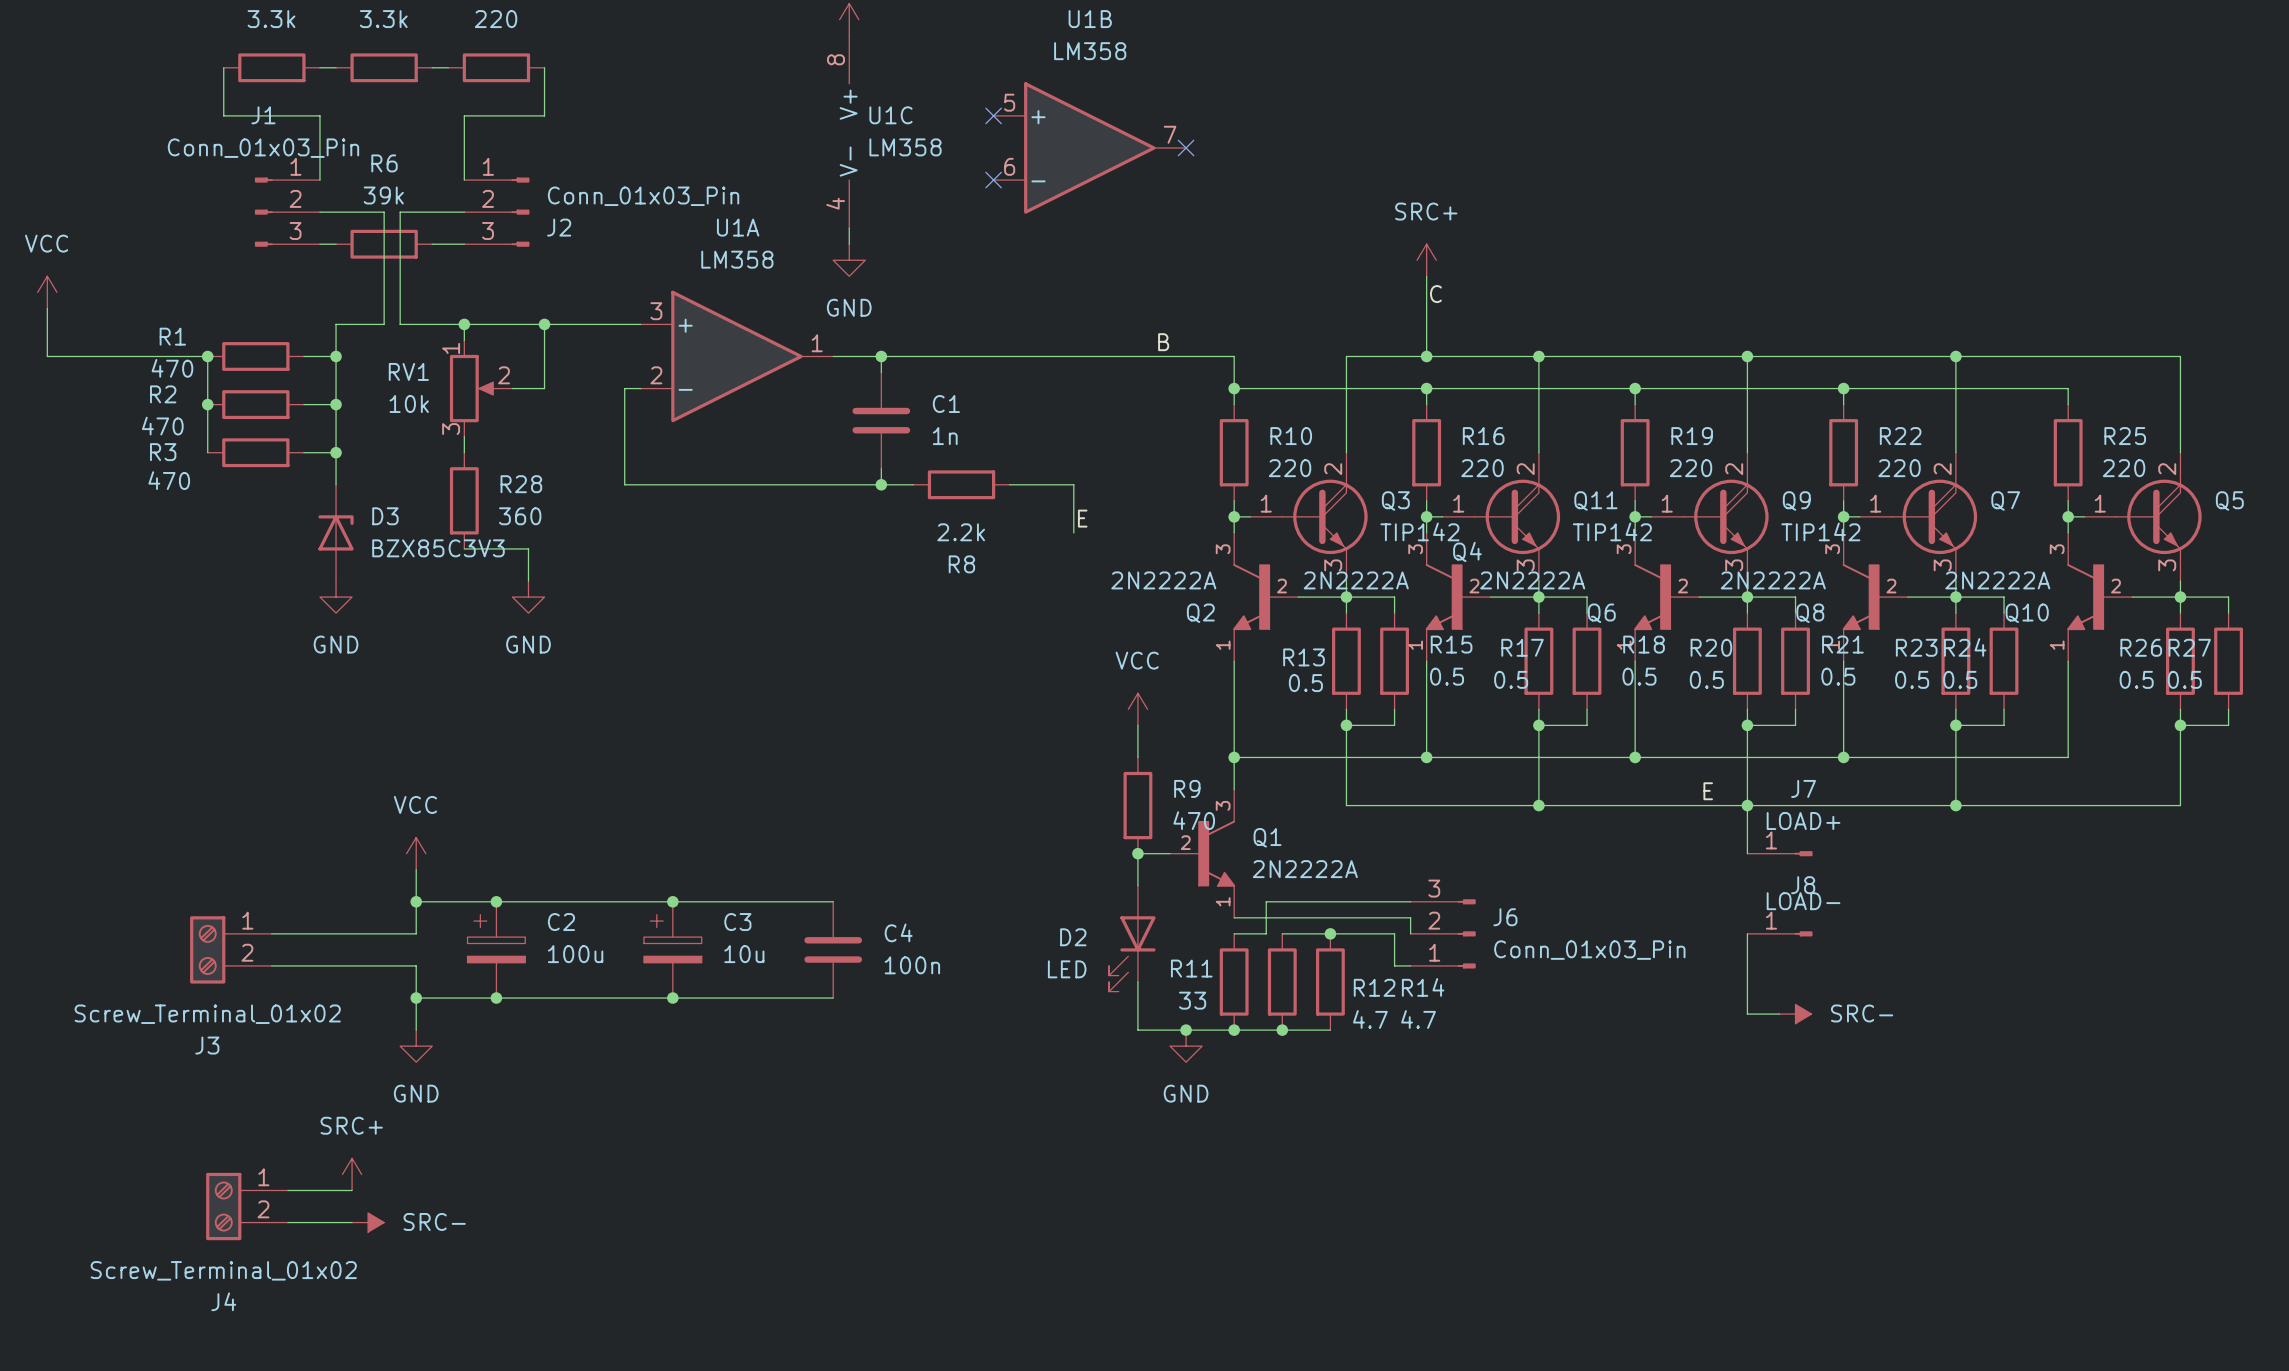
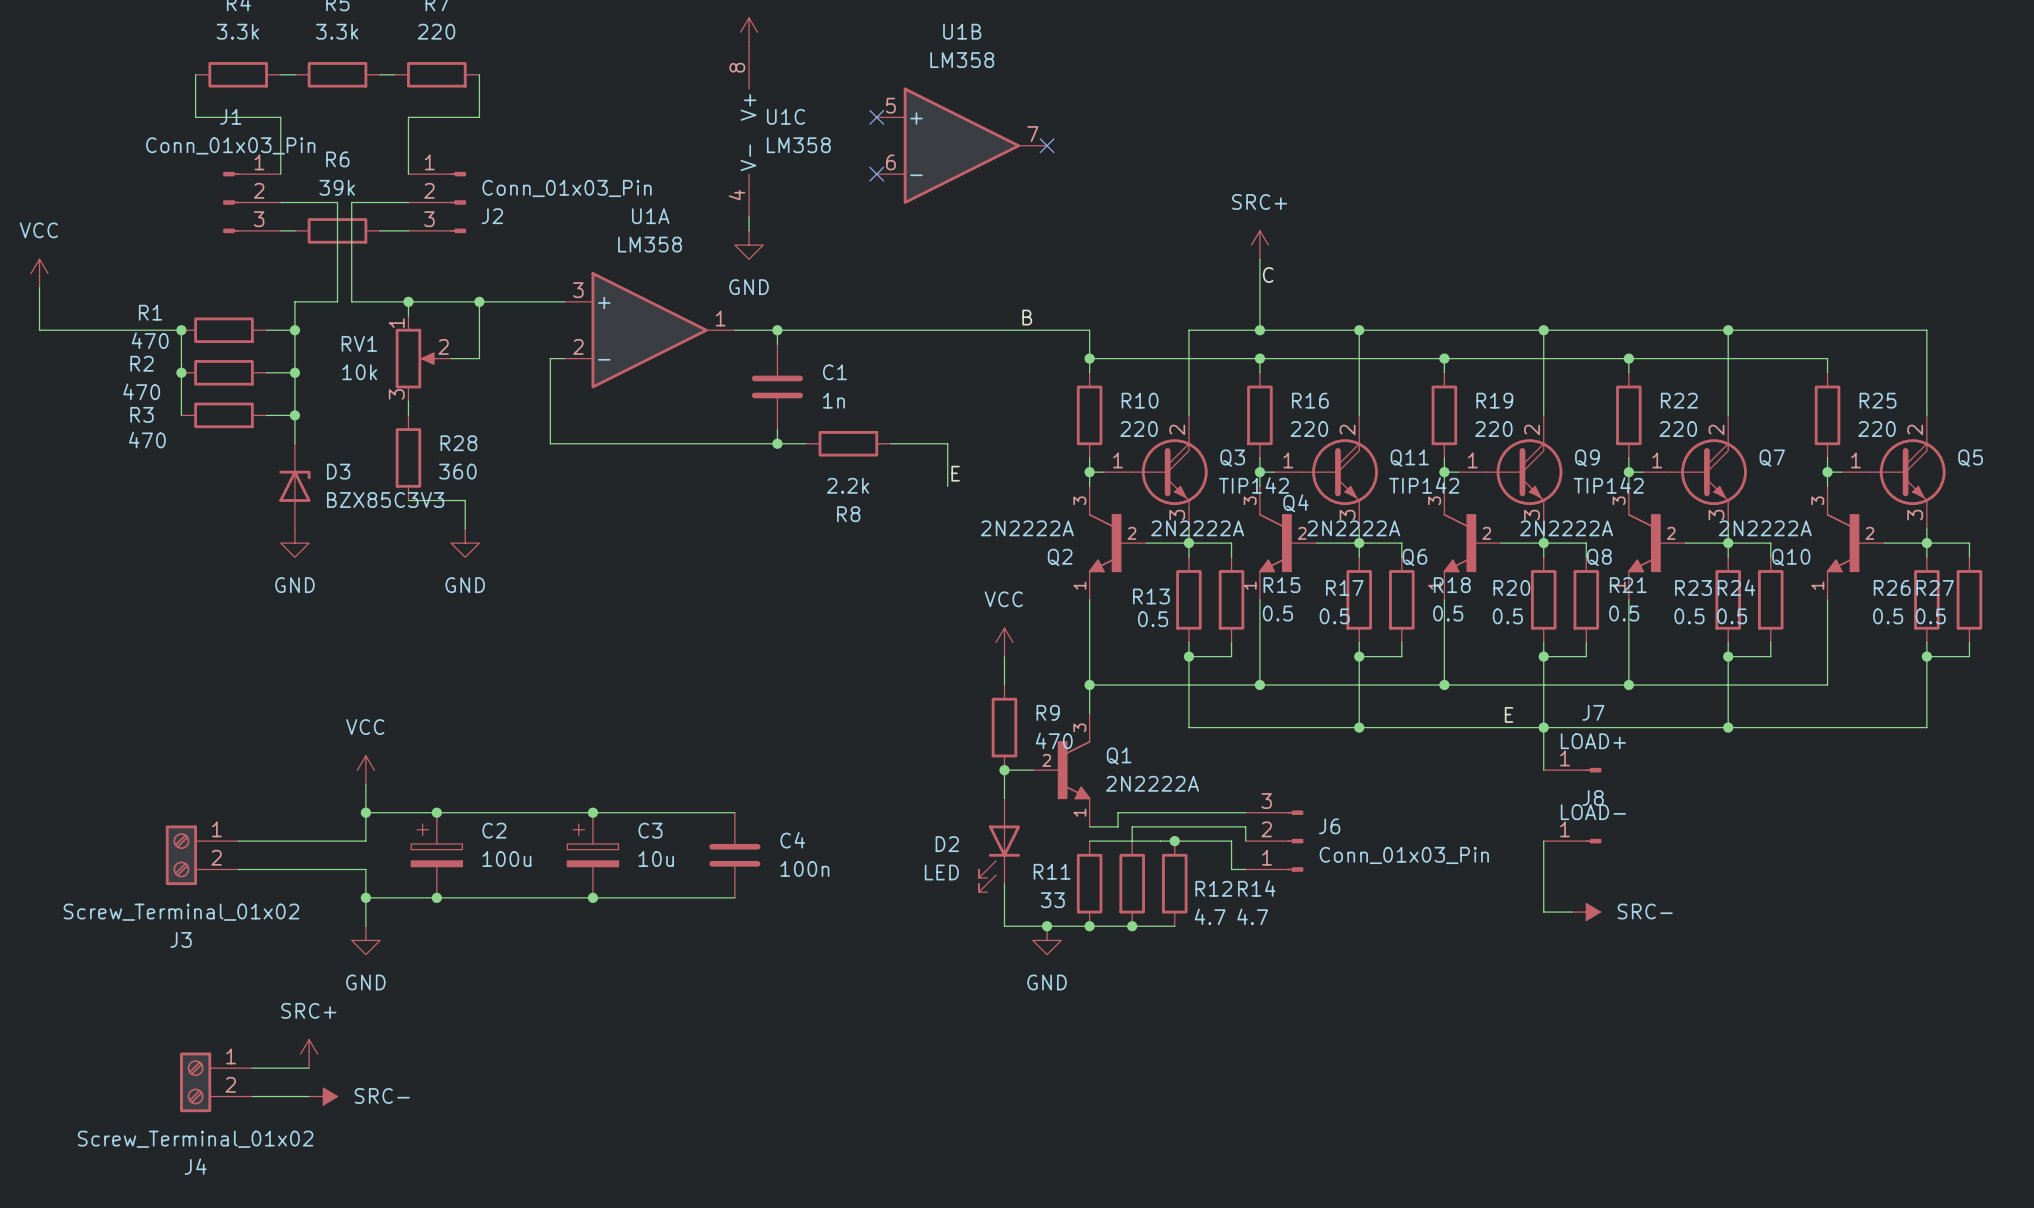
wire: (1282, 917) (1266, 917) (1266, 933) -> (1132, 826) (1132, 841) (1118, 841)

